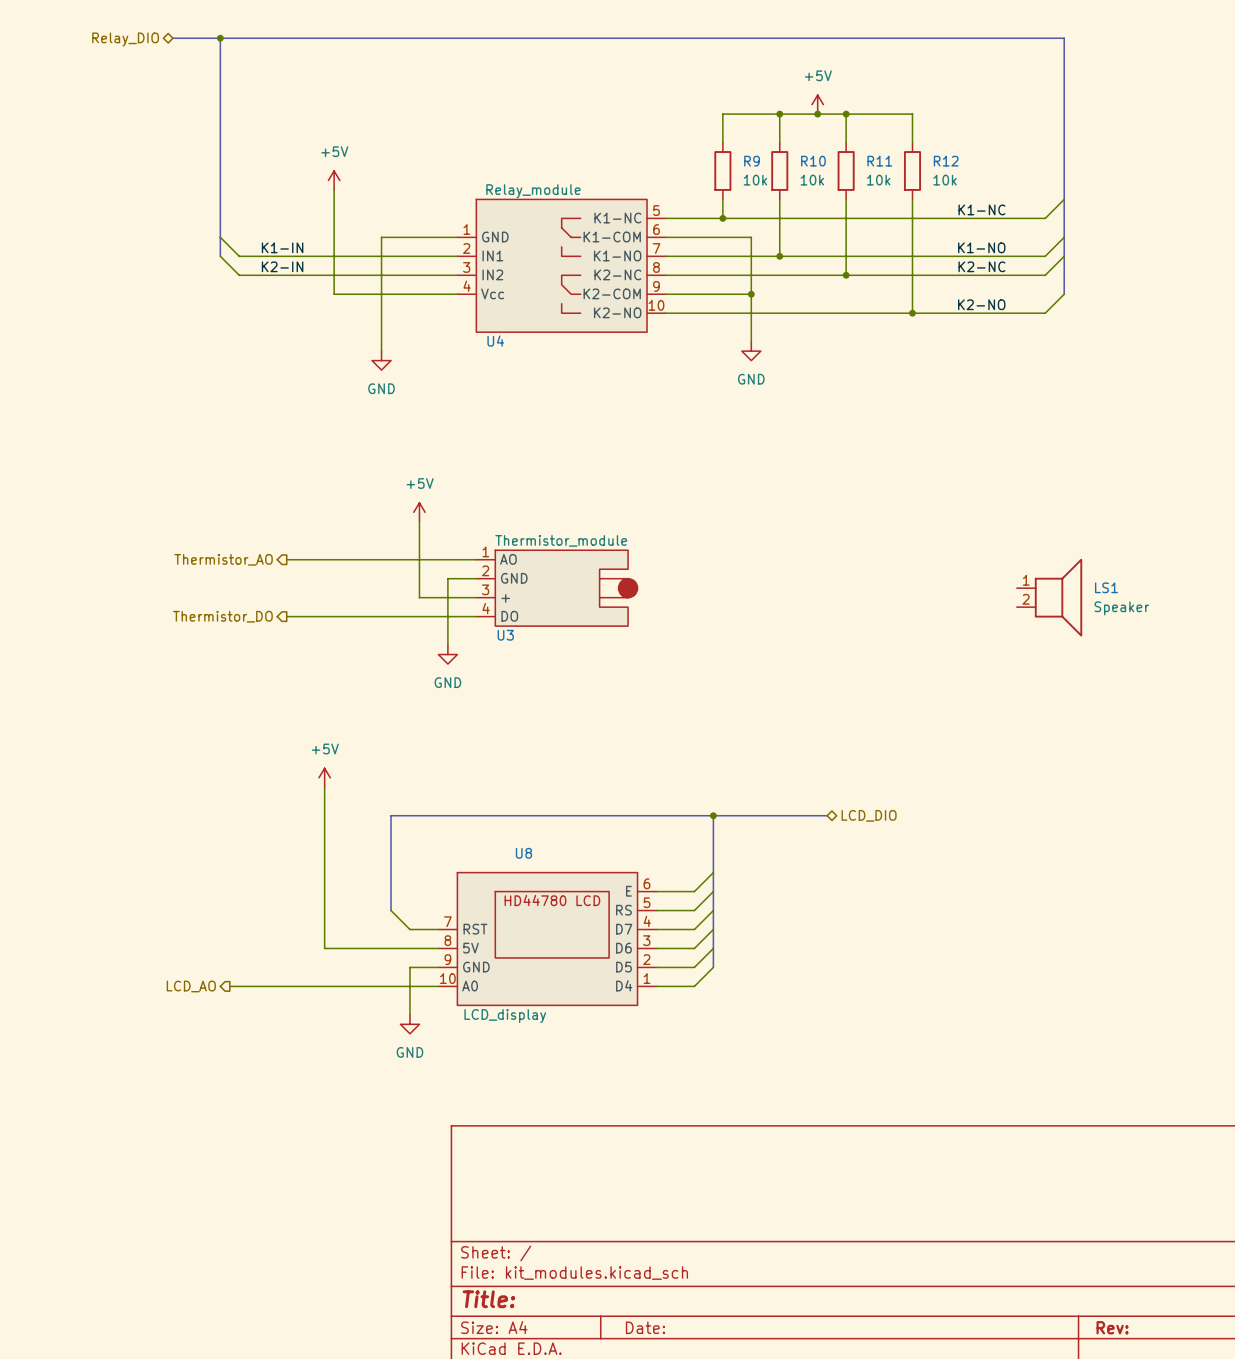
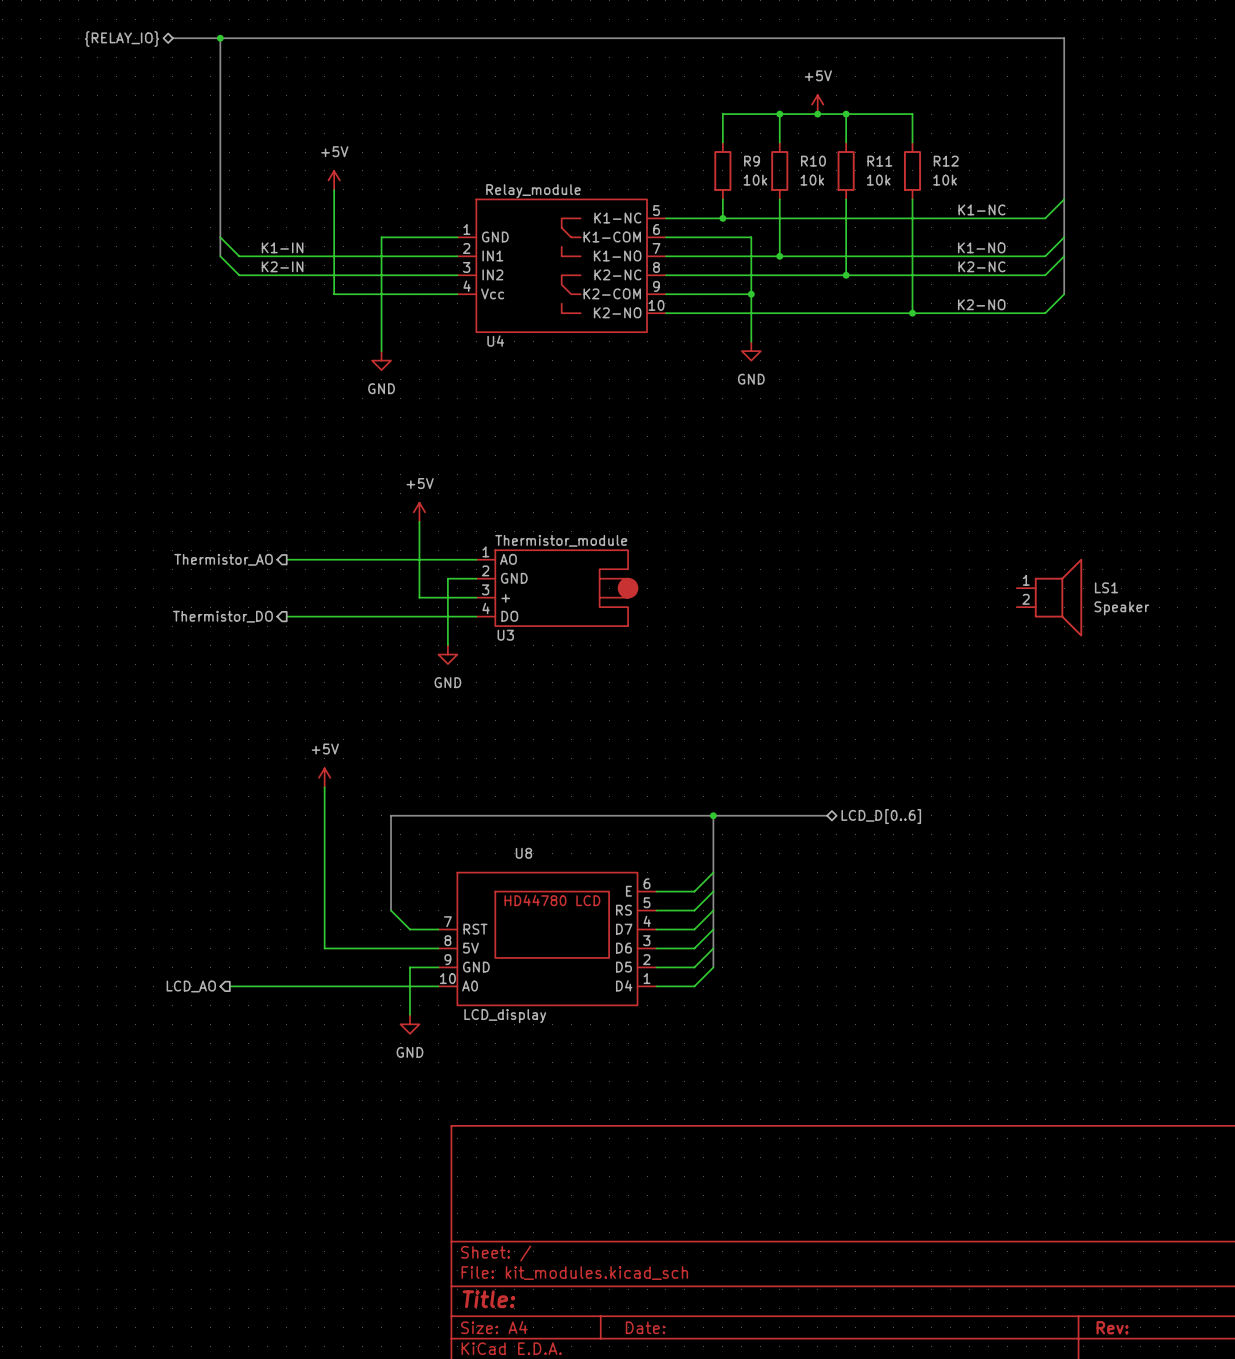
hierarchical label: Relay_DIO (125, 39) -> {RELAY_IO} (121, 39)
hierarchical label: LCD_DIO (869, 815) -> LCD_D[0..6] (881, 816)

